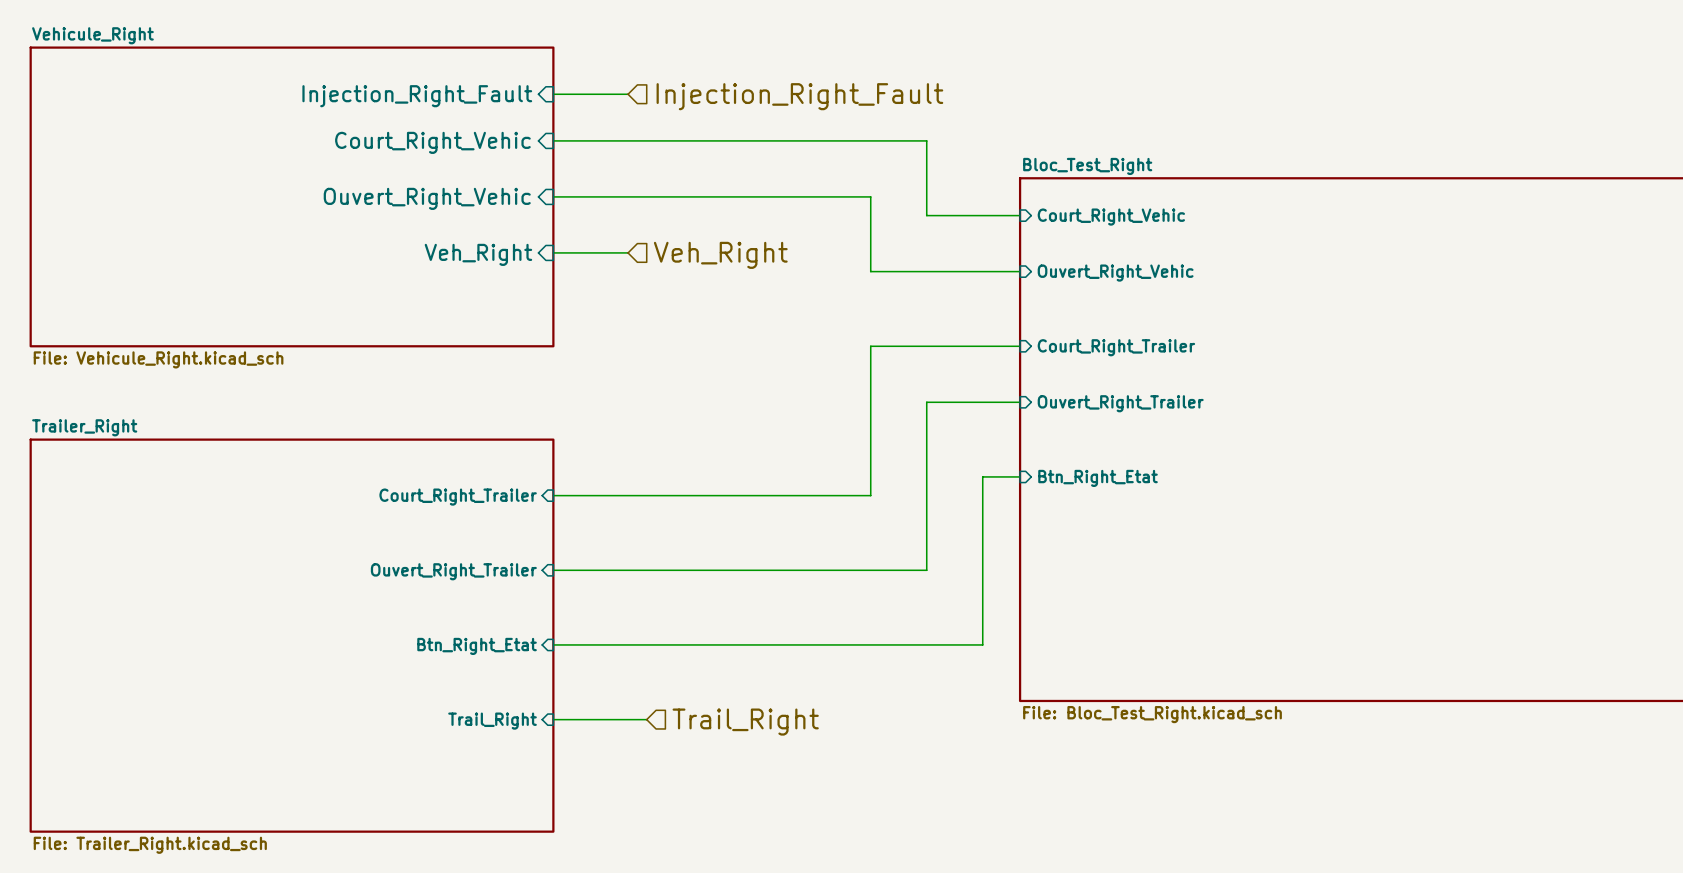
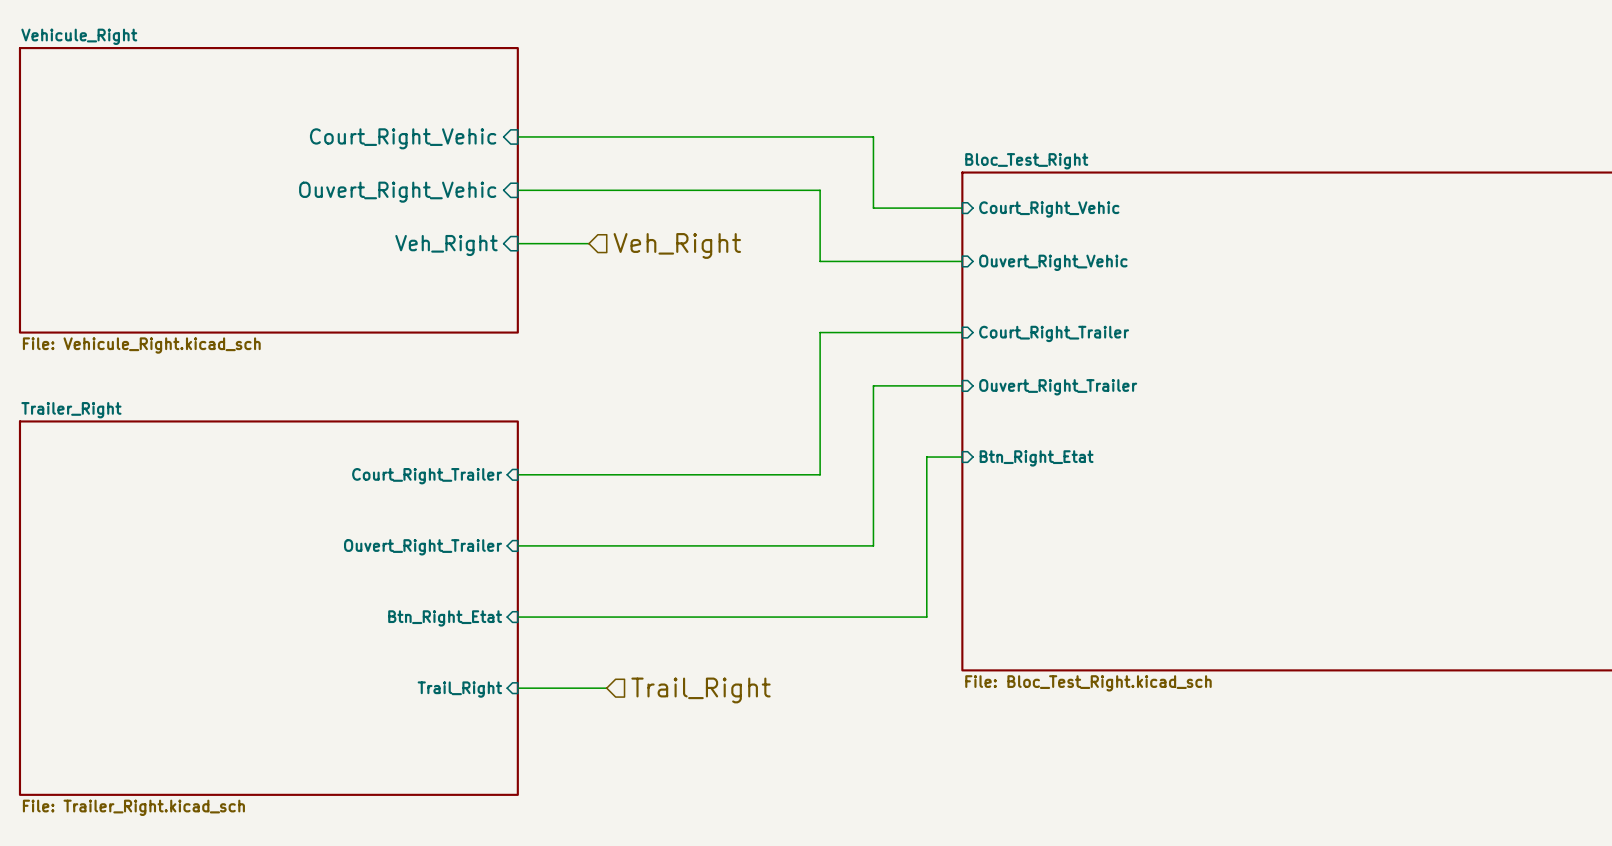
wire: (553, 94) (628, 94) -> none
sheet pin: Injection_Right_Fault (417, 96) -> none
hierarchical label: Injection_Right_Fault (799, 96) -> none

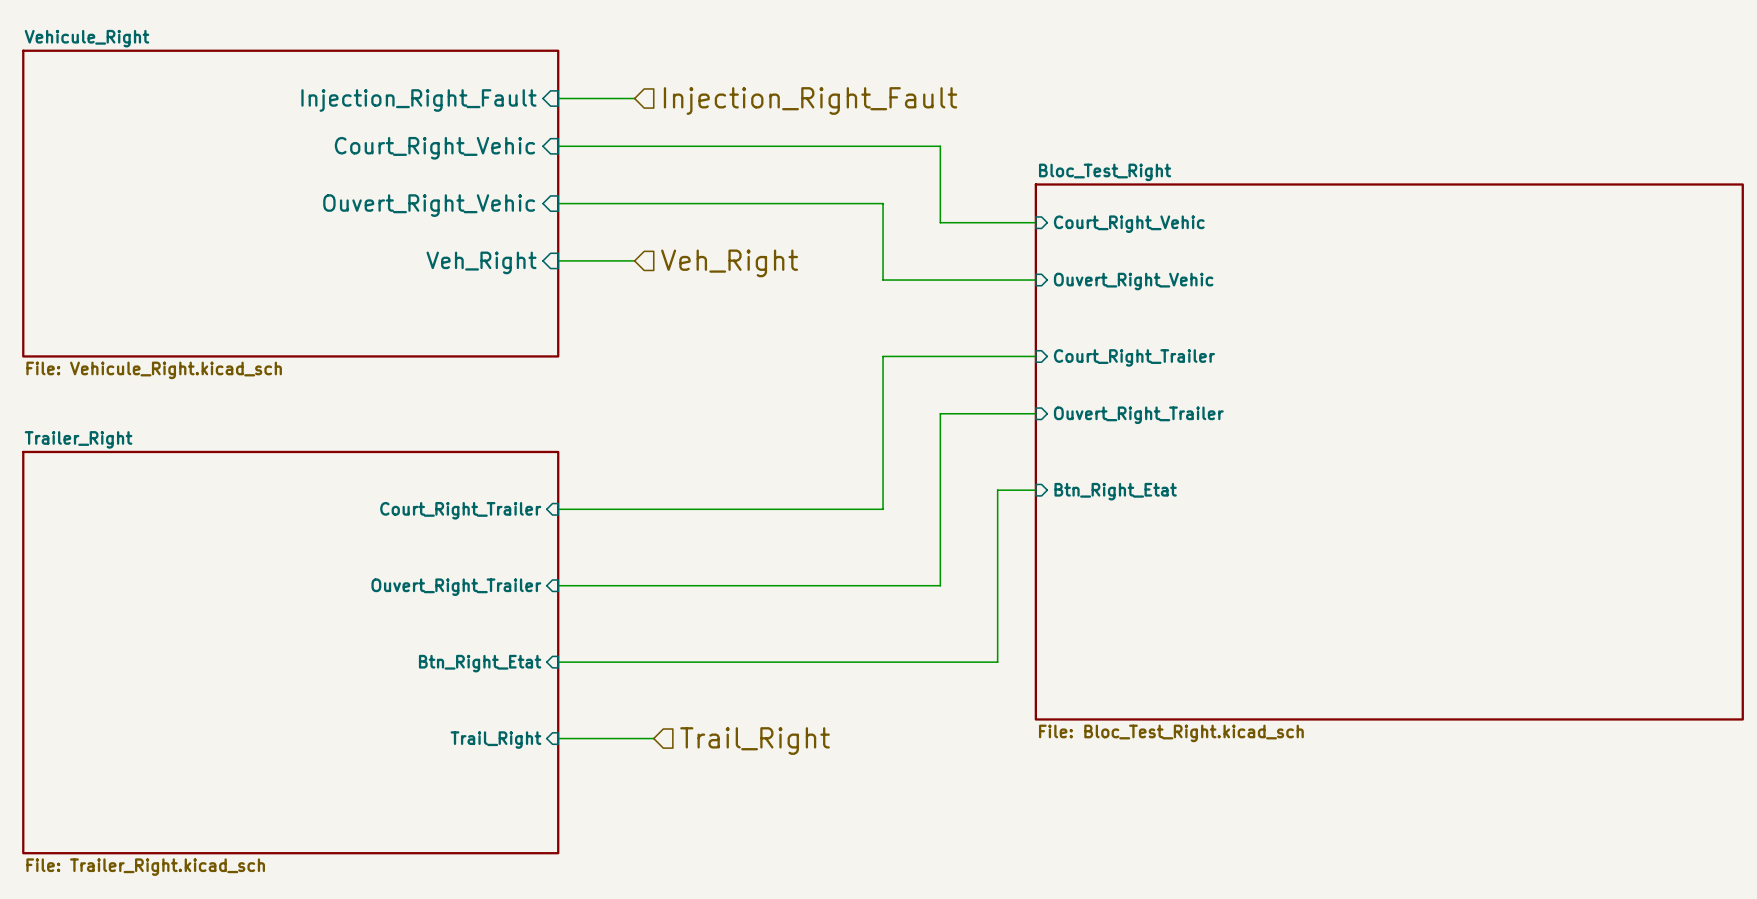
wire: none -> (558, 98) (634, 98)
sheet pin: none -> Injection_Right_Fault (418, 100)
hierarchical label: none -> Injection_Right_Fault (810, 100)

